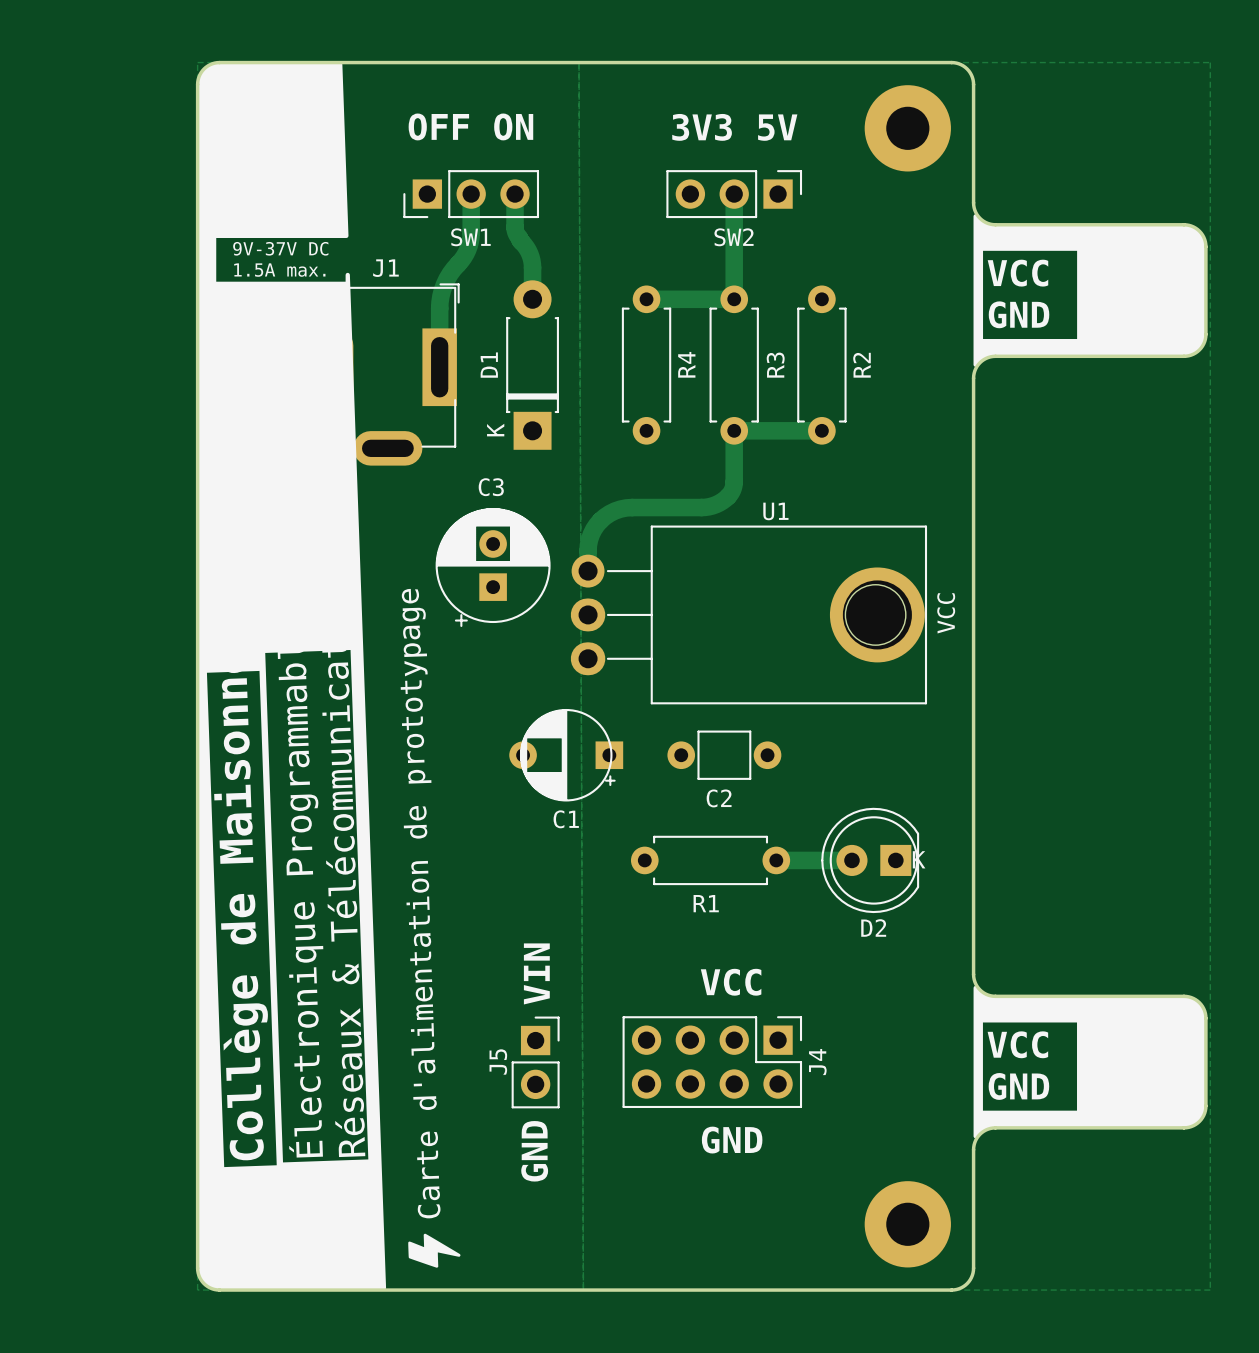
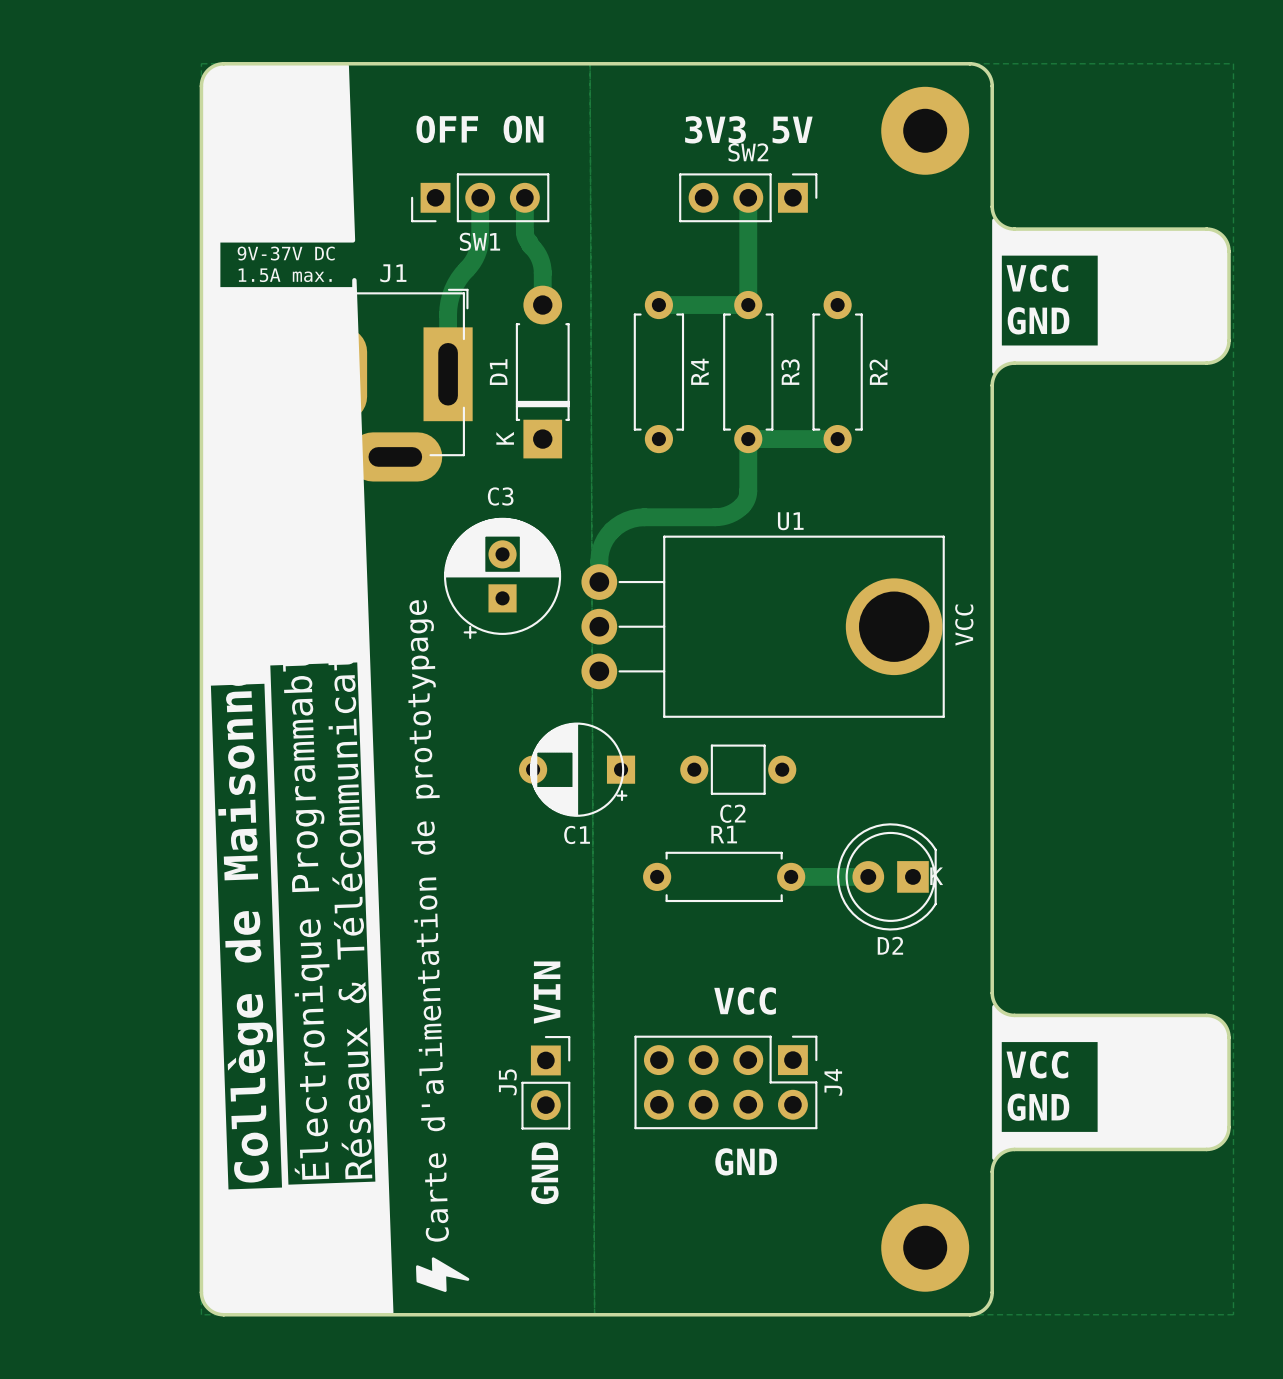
SW2 name position: SW2 (734, 237) -> SW2 (748, 152)
J1 footprint: [200, 283, 460, 466] -> [204, 288, 473, 482]
U1 footprint: [570, 525, 928, 705] -> [581, 535, 945, 718]
R1 name position: R1 (706, 903) -> R1 (724, 834)

